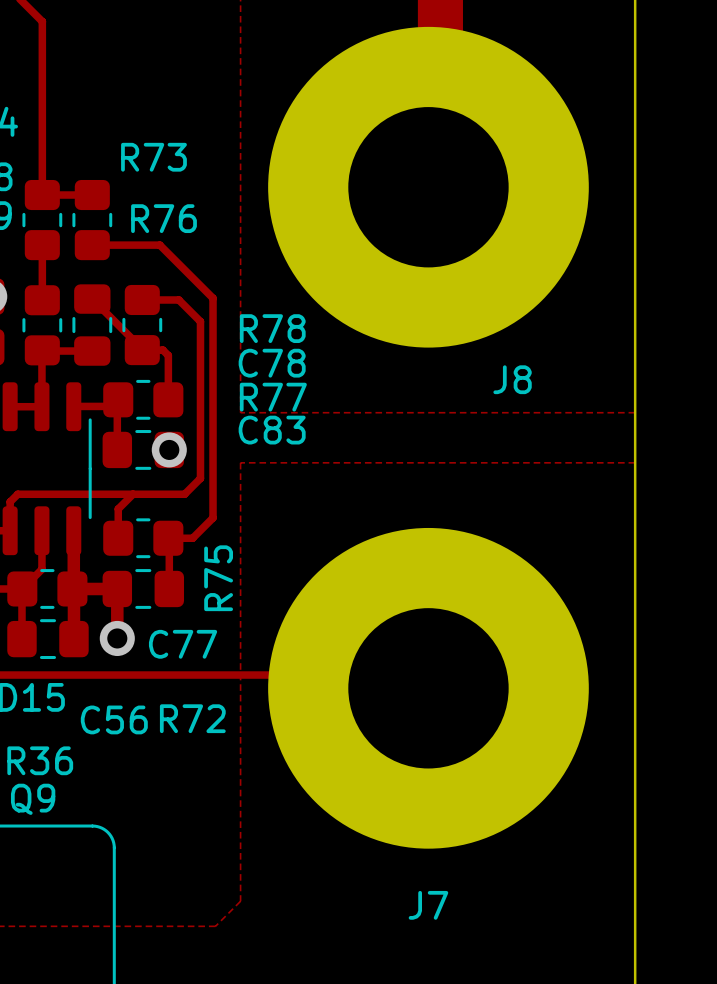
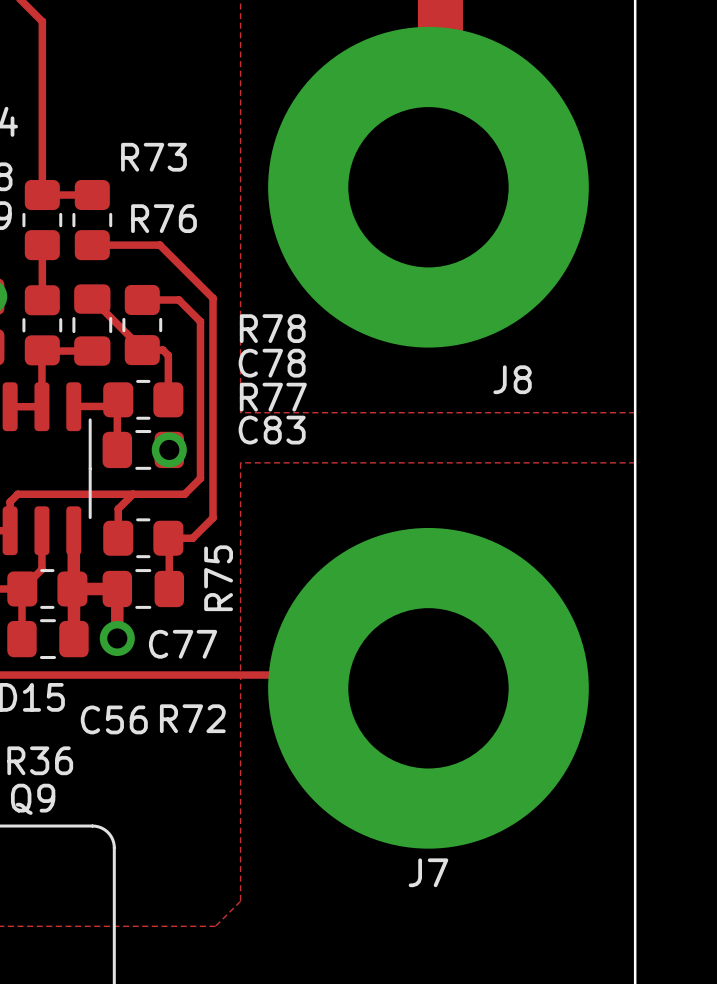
J7 name position: J7 (428, 905) -> J7 (428, 872)

